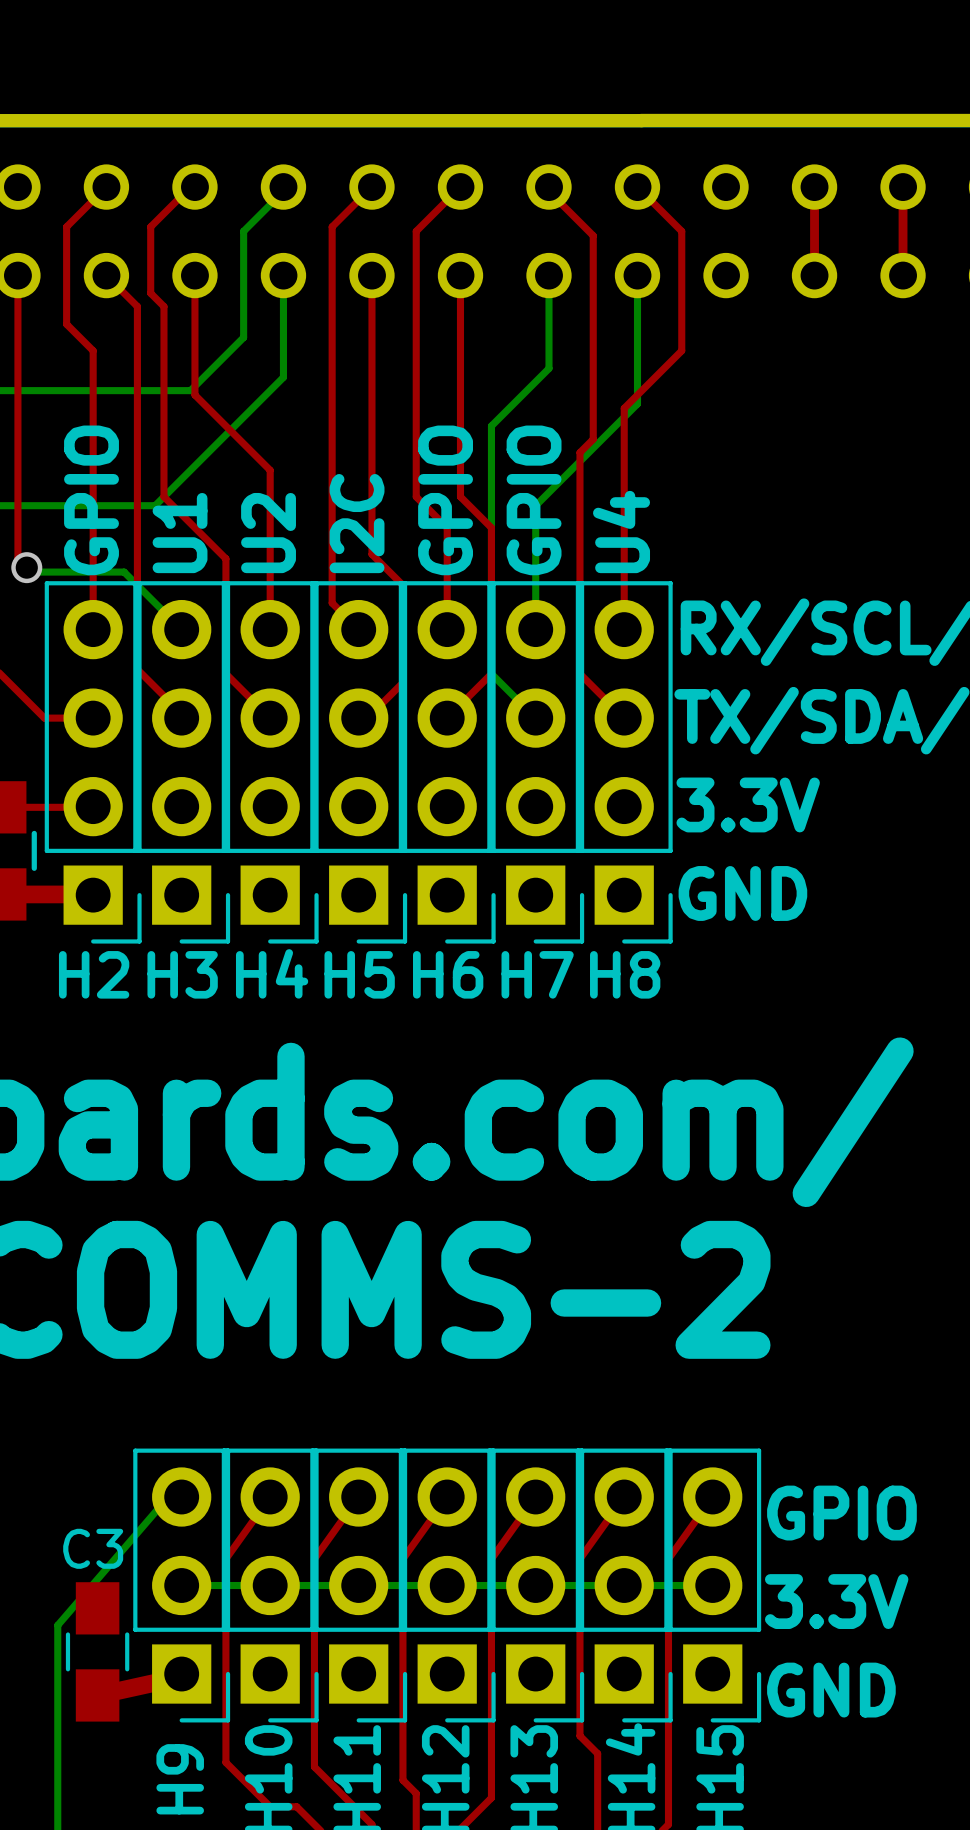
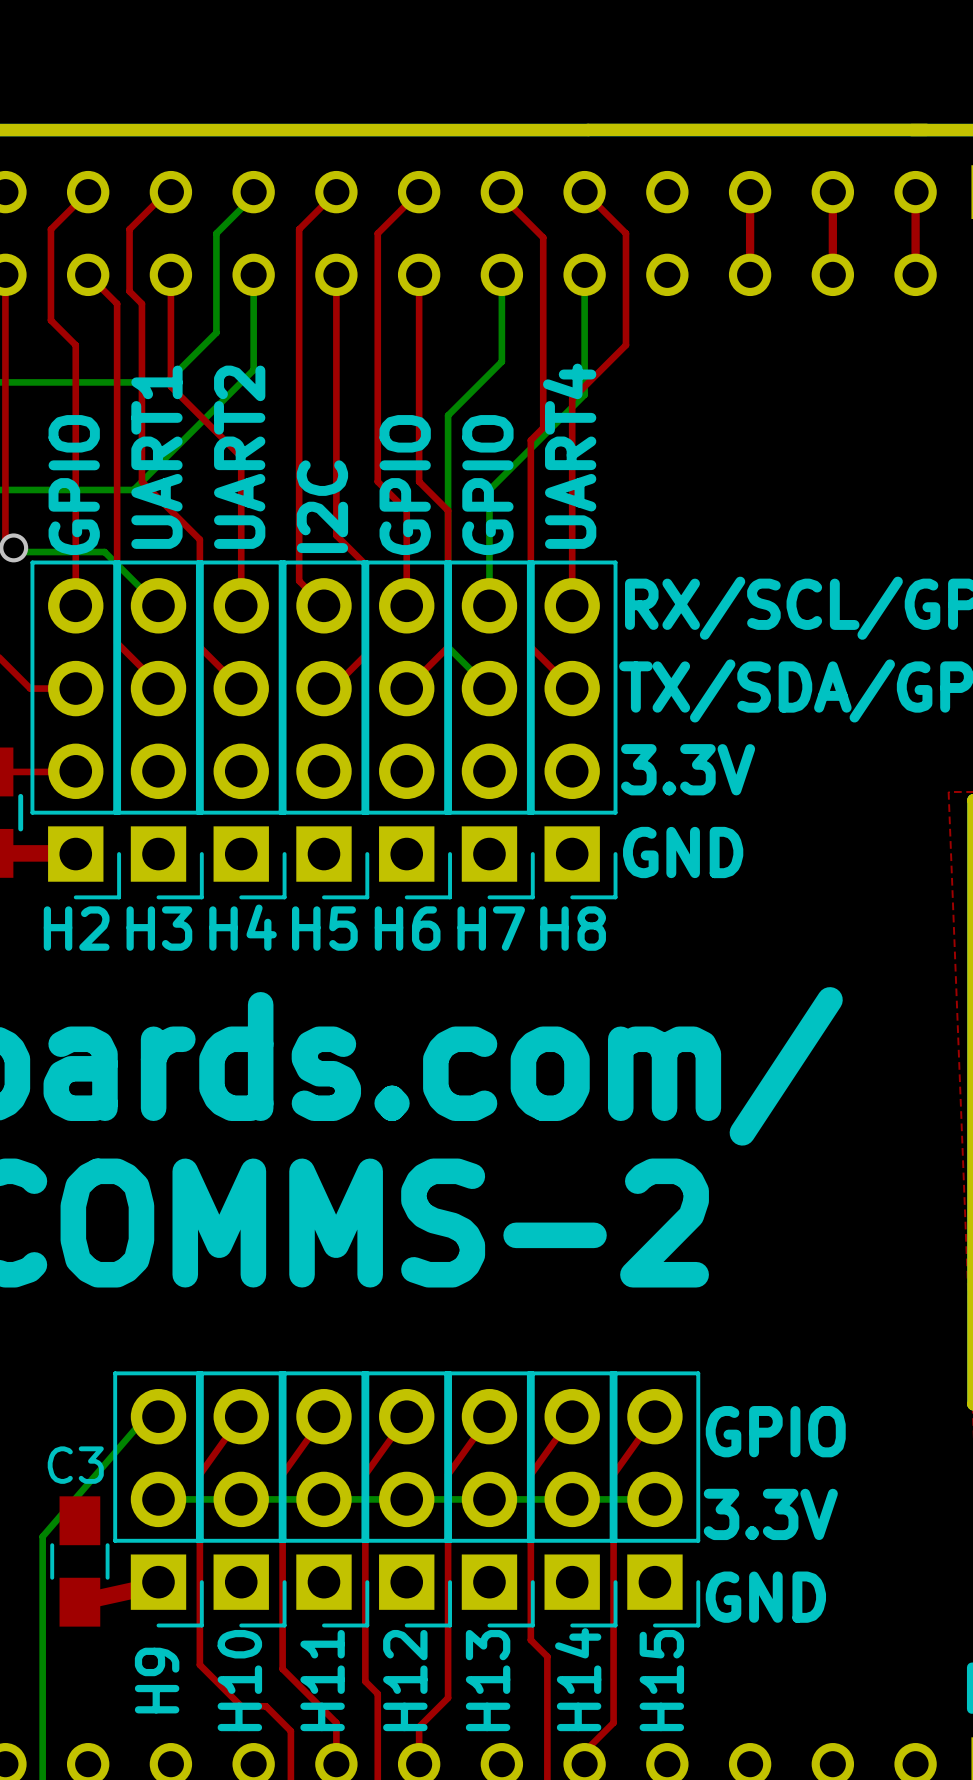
text: U4 (621, 532) -> UART4 (569, 456)
text: U1 (180, 533) -> UART1 (156, 457)
text: U2 (268, 533) -> UART2 (239, 457)

